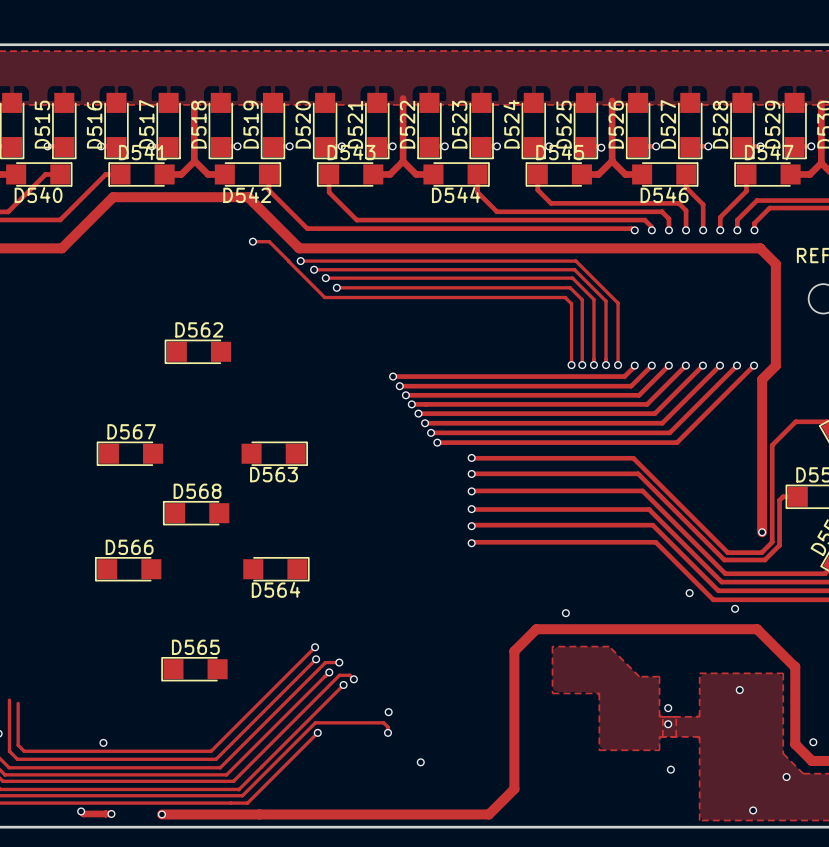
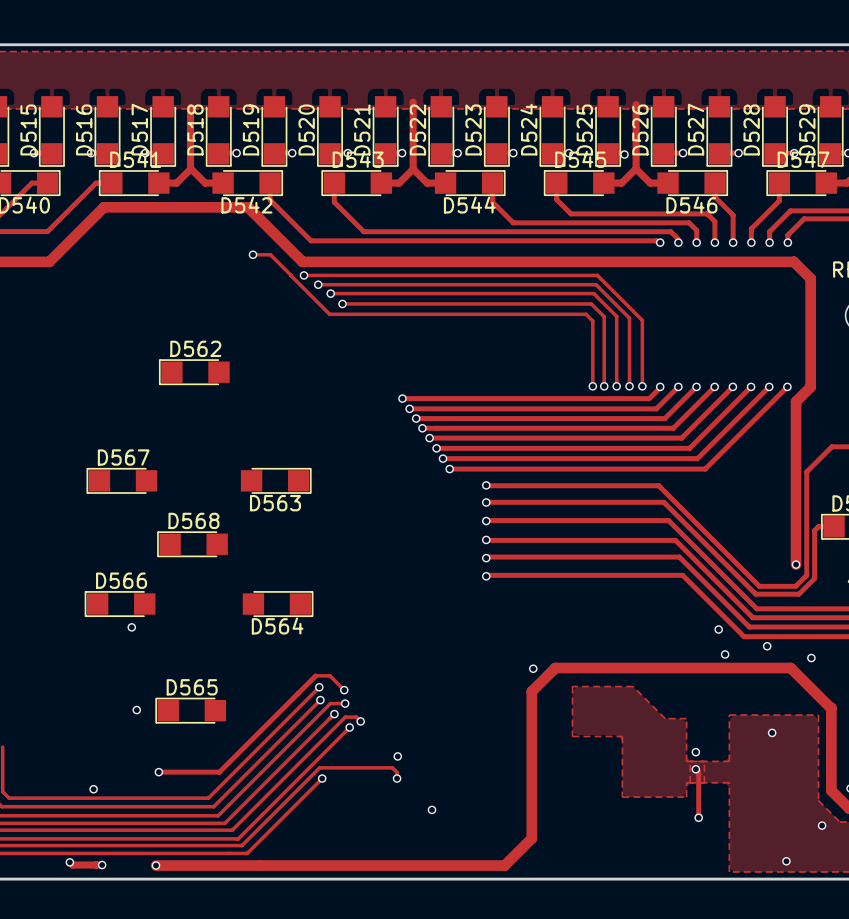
via: none -> (131, 627)
via position: (565, 613) -> (533, 668)
via: none -> (725, 654)
via: none -> (811, 658)
track: none -> (344, 690) (330, 675) (315, 675) (219, 772) (158, 772)
via: none -> (344, 690)
via: none -> (136, 710)
track: none -> (695, 769) (698, 772) (698, 817)
via: none -> (158, 772)

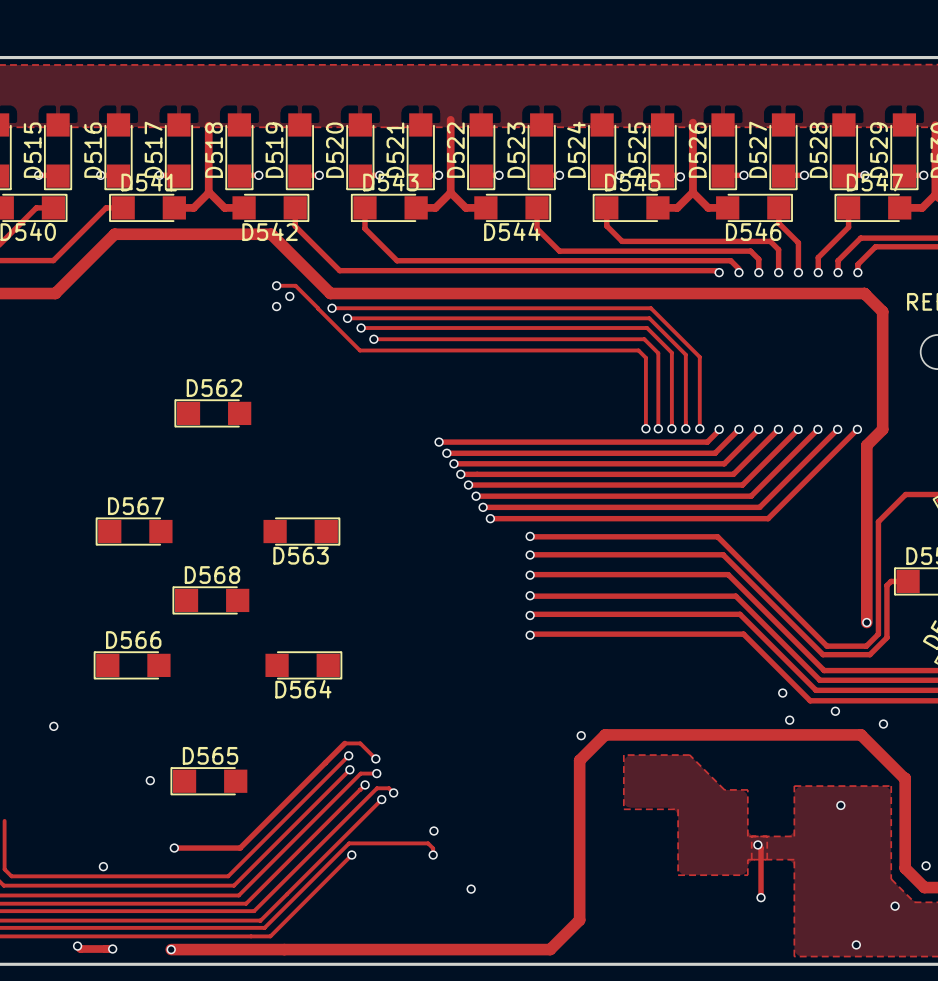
via: none -> (289, 296)
via: none -> (276, 306)
via: (131, 627) -> none
via: none -> (53, 726)
via: (695, 752) -> none

